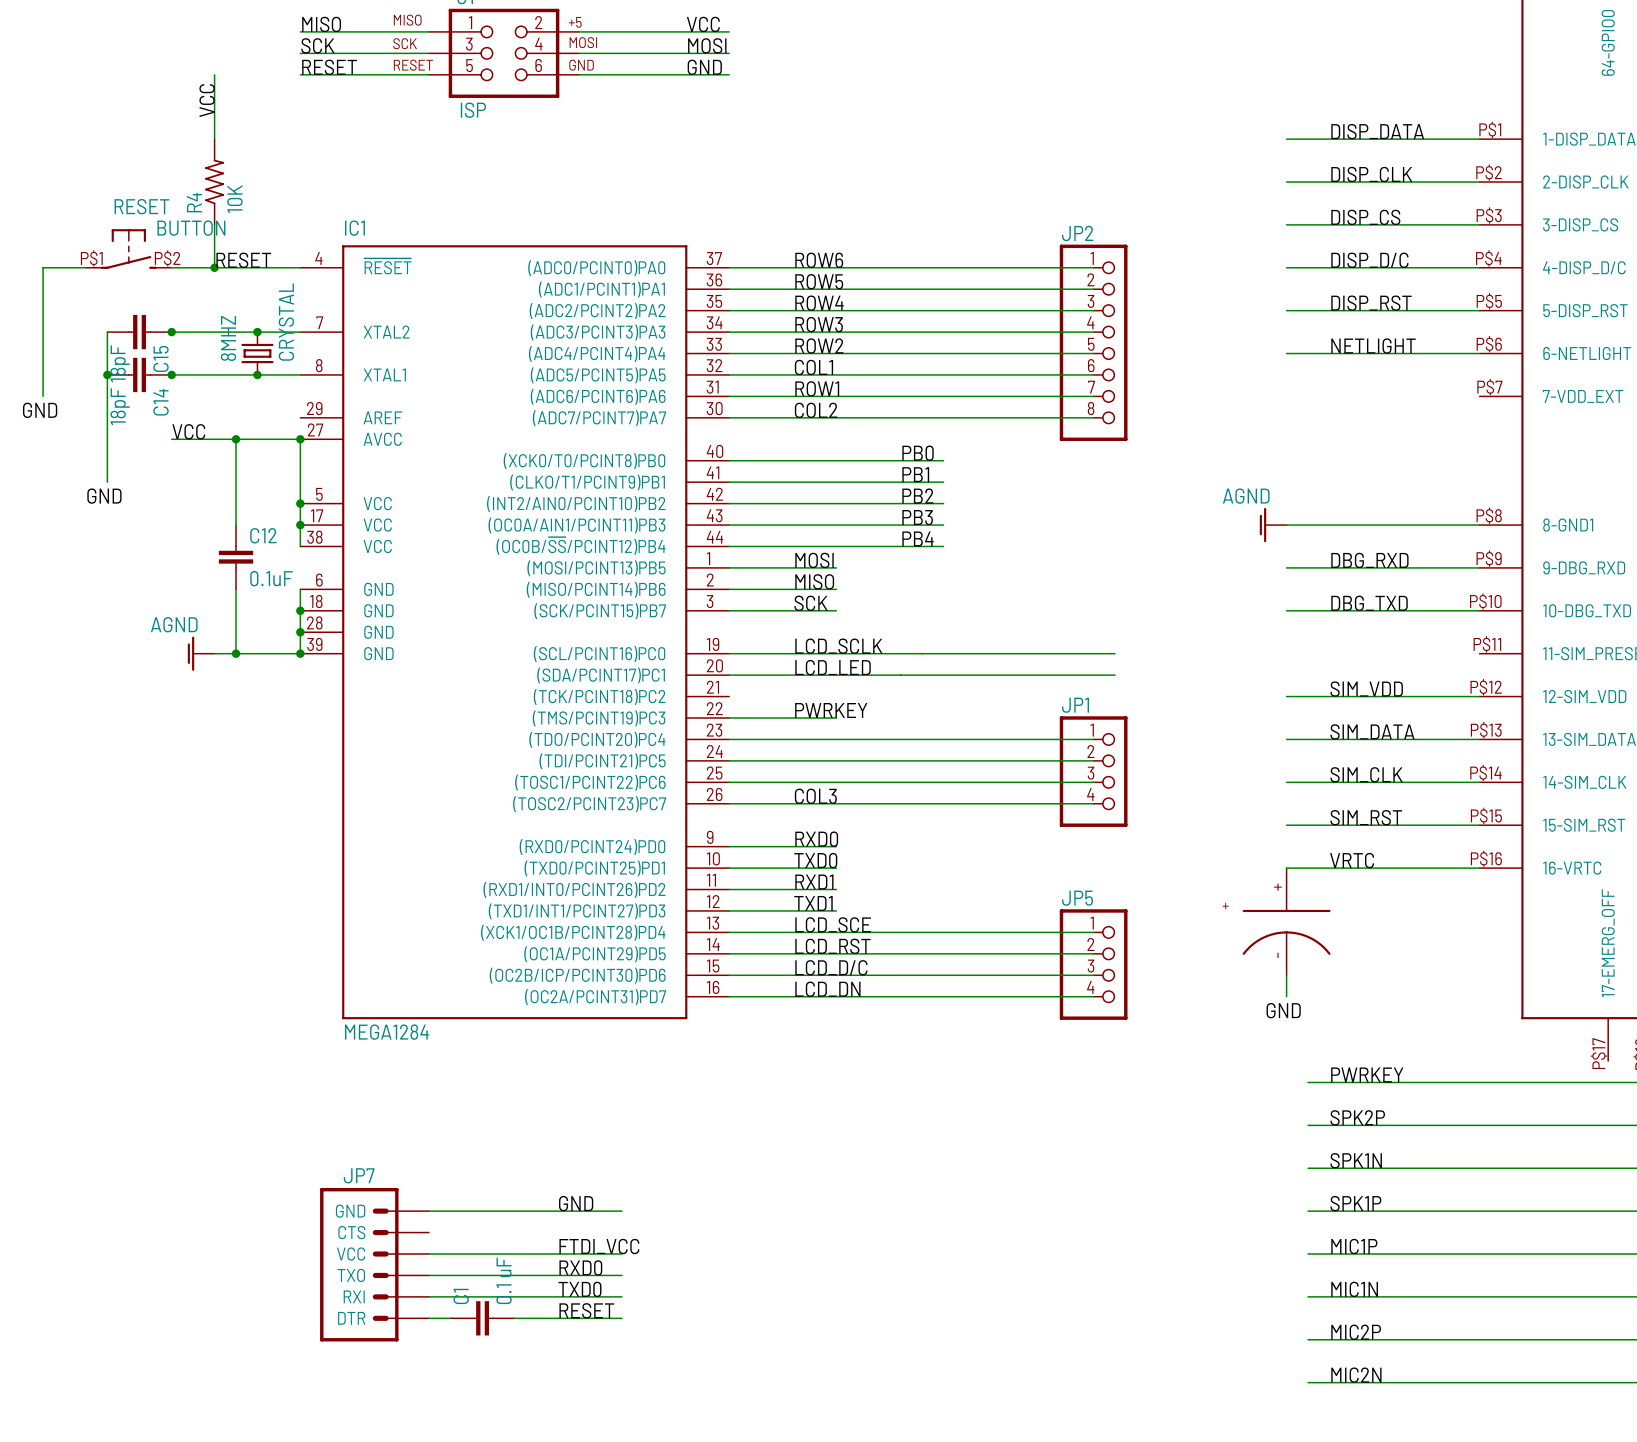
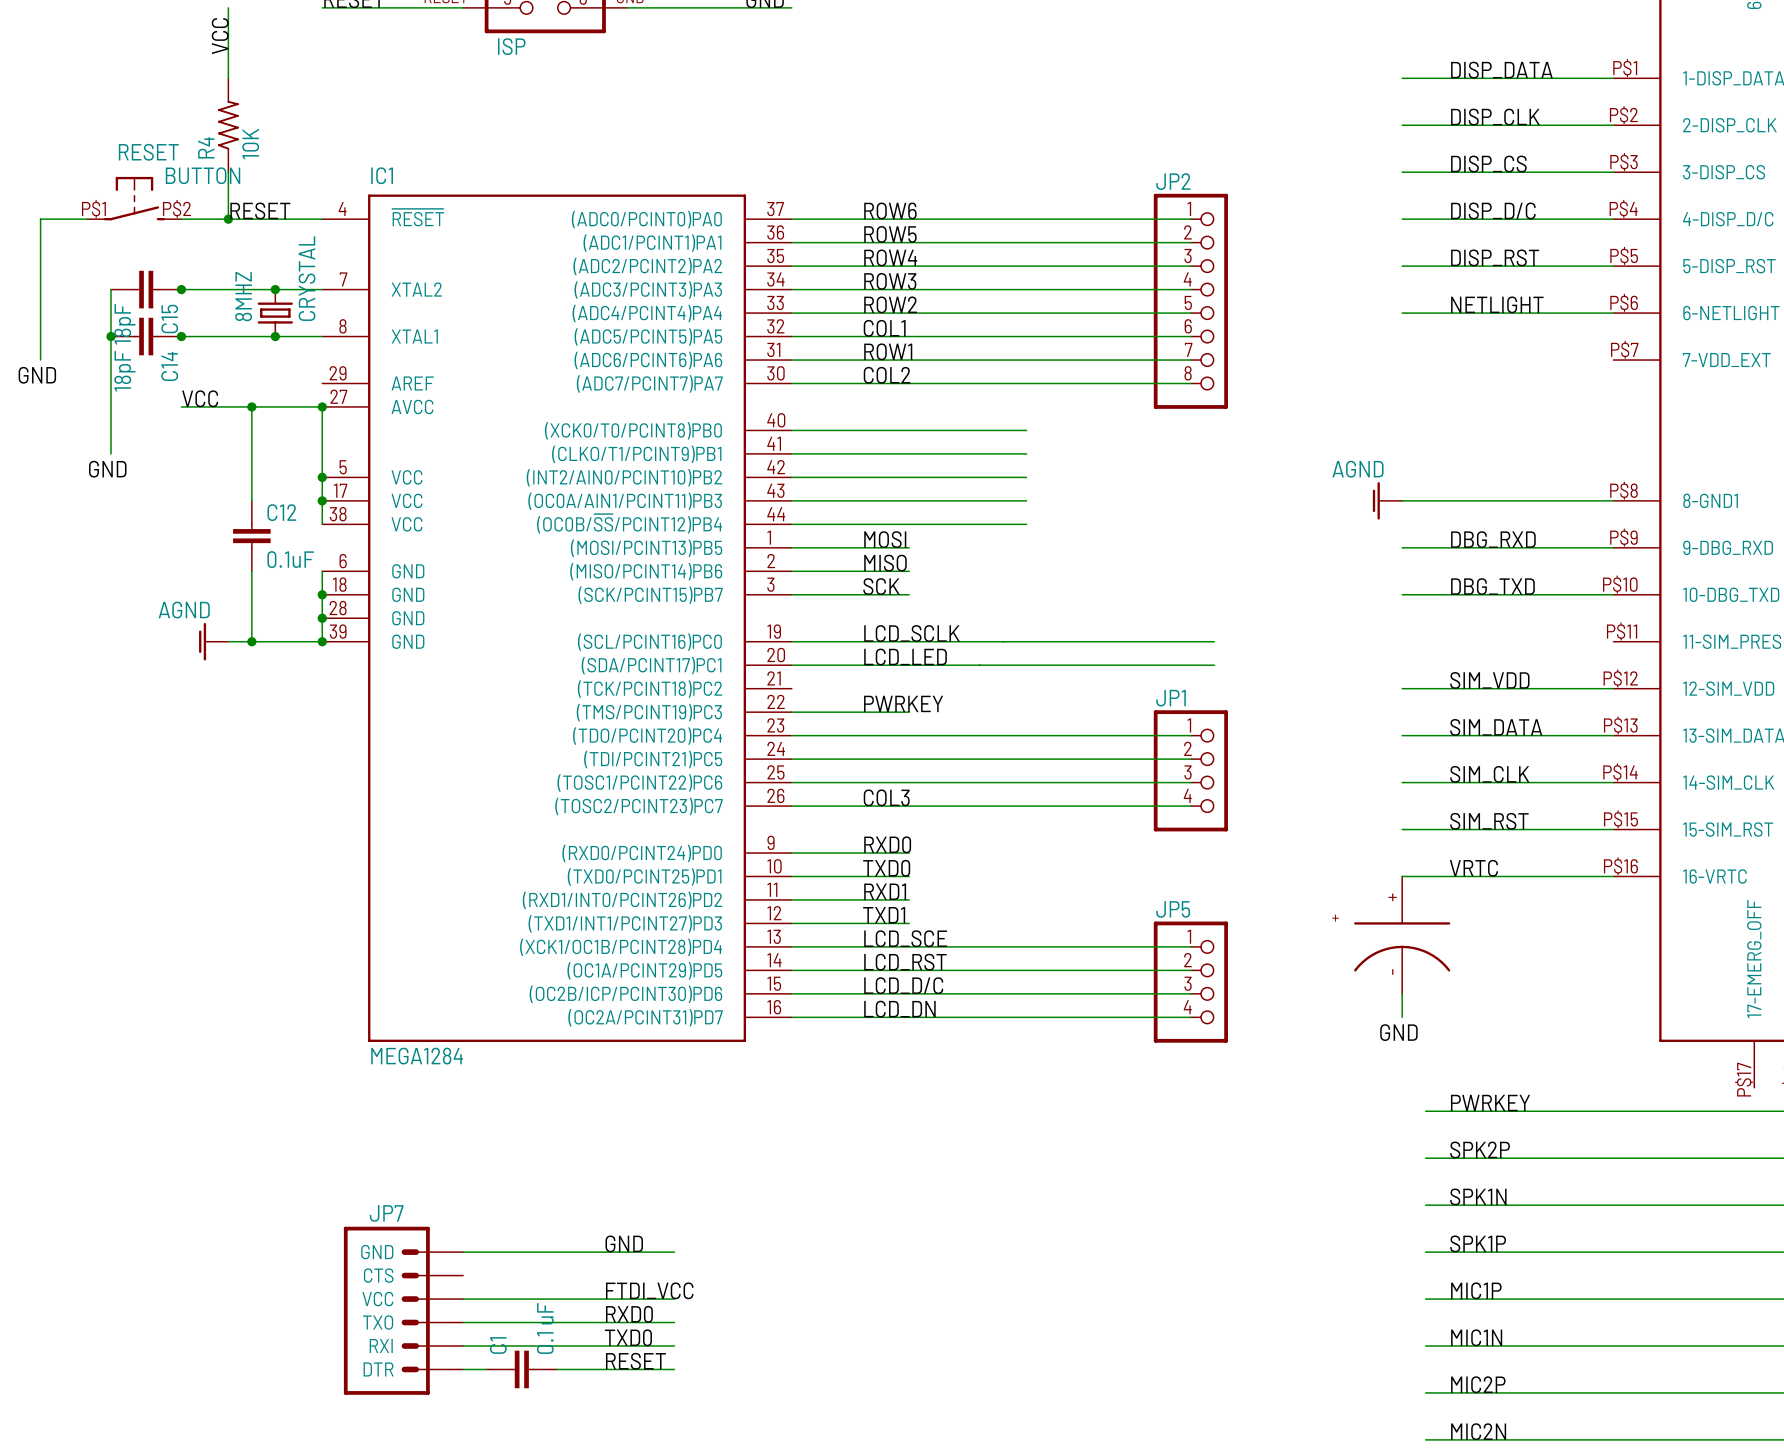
label: PB0 (918, 453) -> none
label: PB1 (915, 474) -> none
label: PB2 (917, 496) -> none
label: PB3 (917, 517) -> none
label: PB4 (917, 538) -> none

